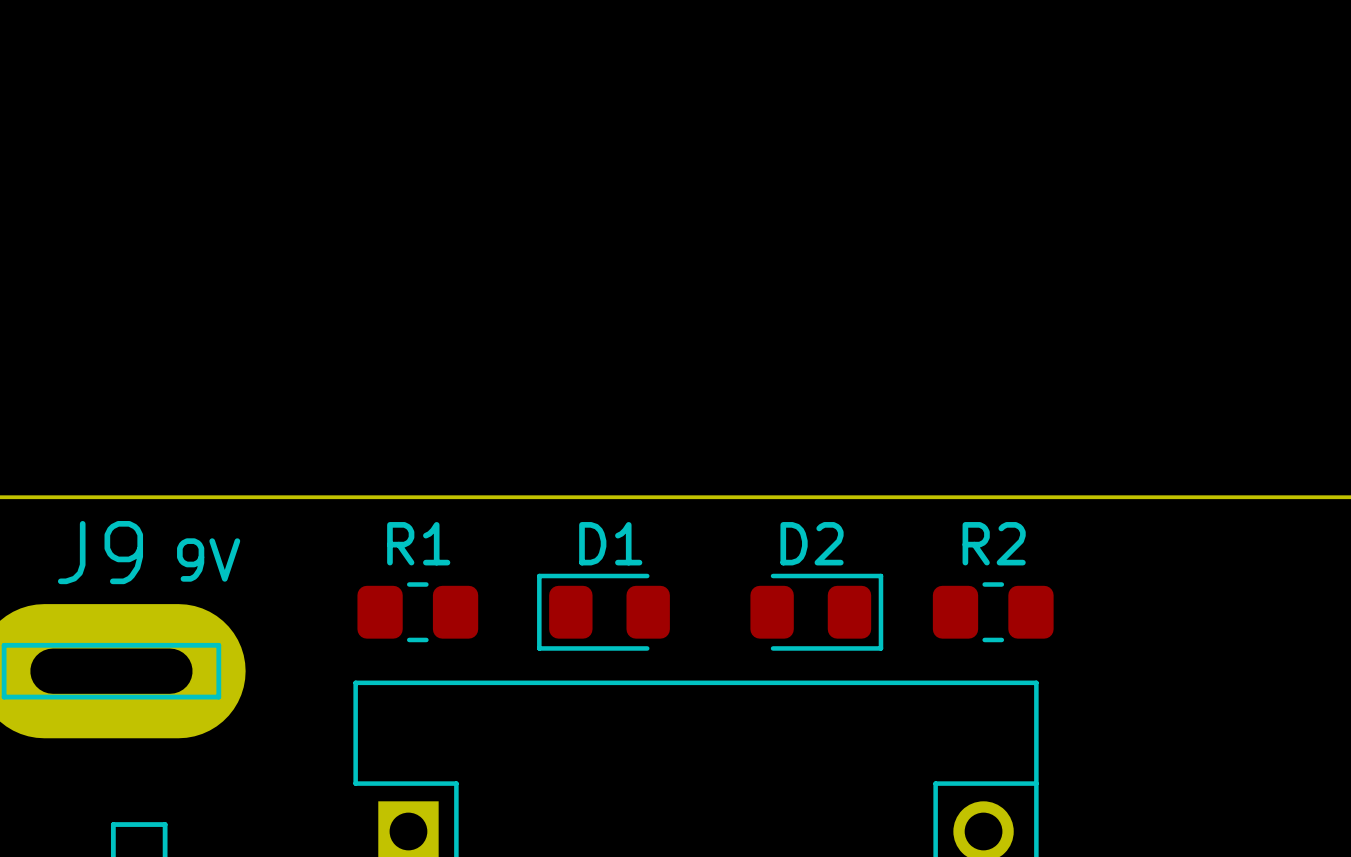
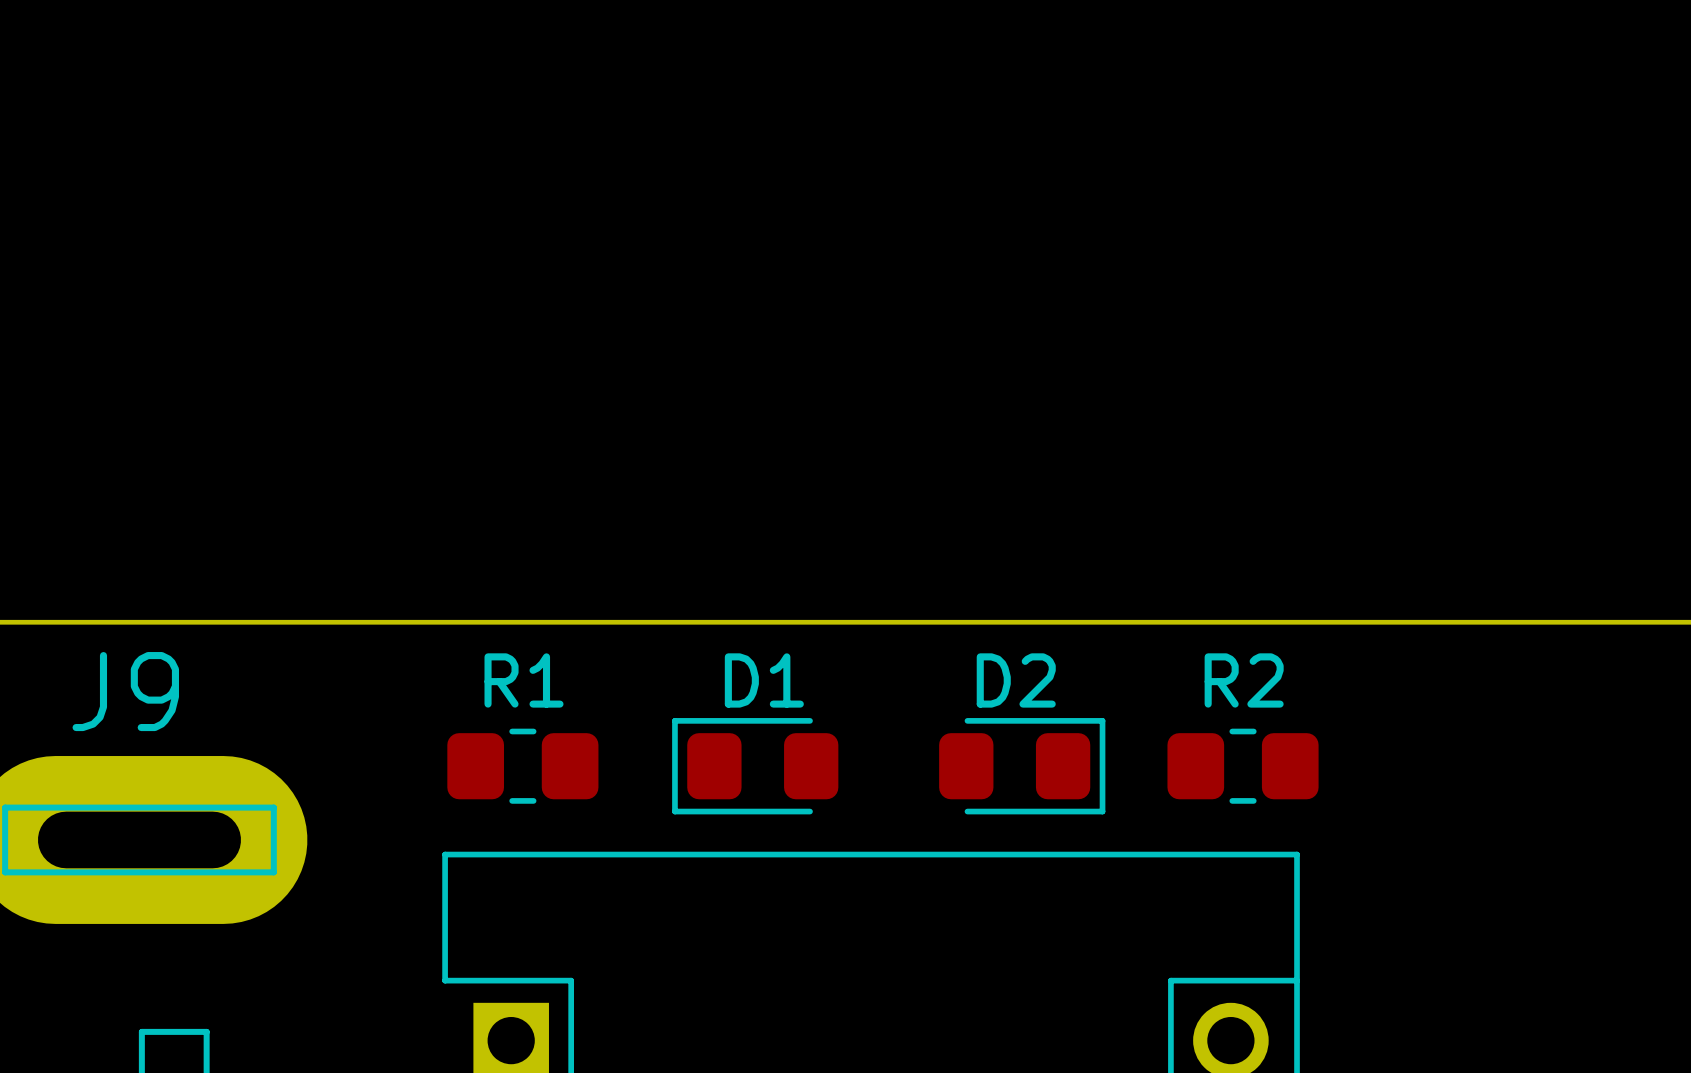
text: 9V (208, 560) -> none

